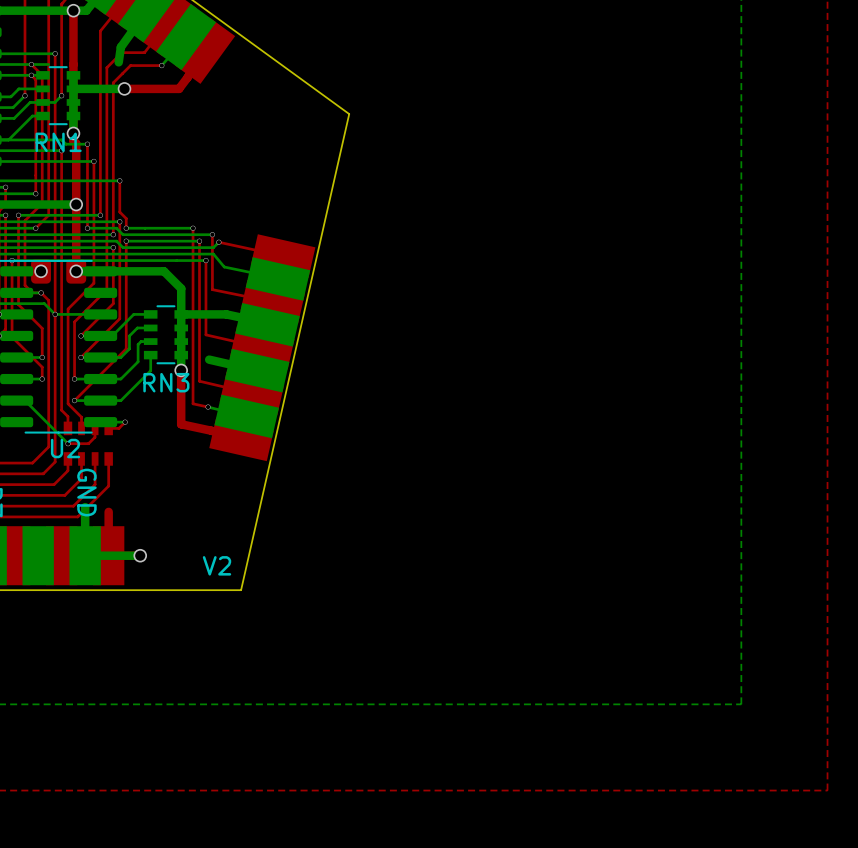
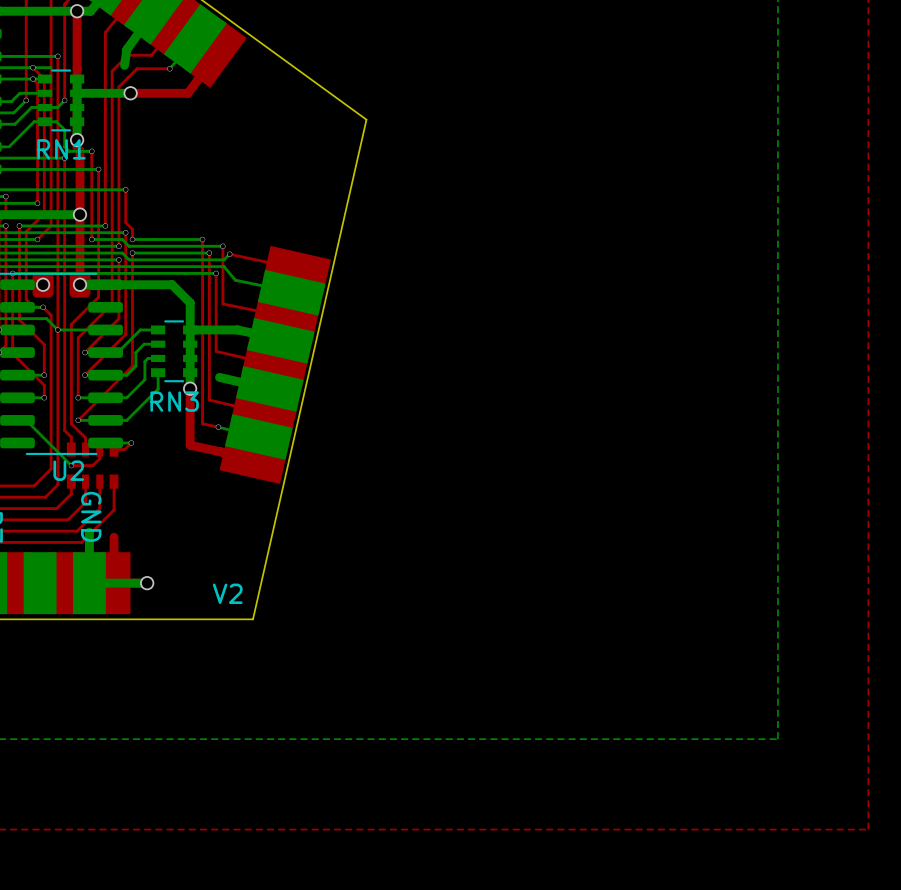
bottom track: (61, 139) (6, 139) -> (64, 146) (64, 129) (56, 121) (45, 121)

